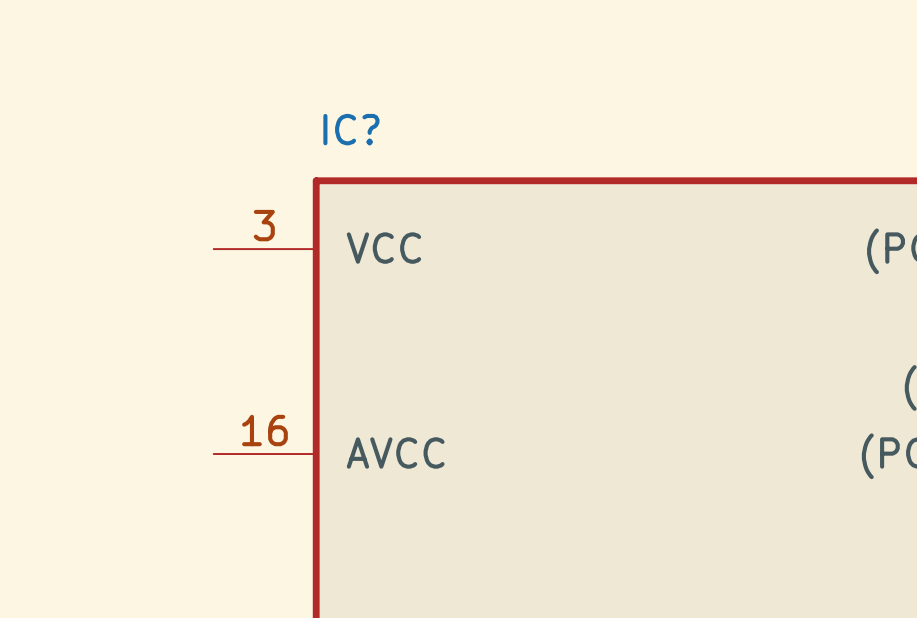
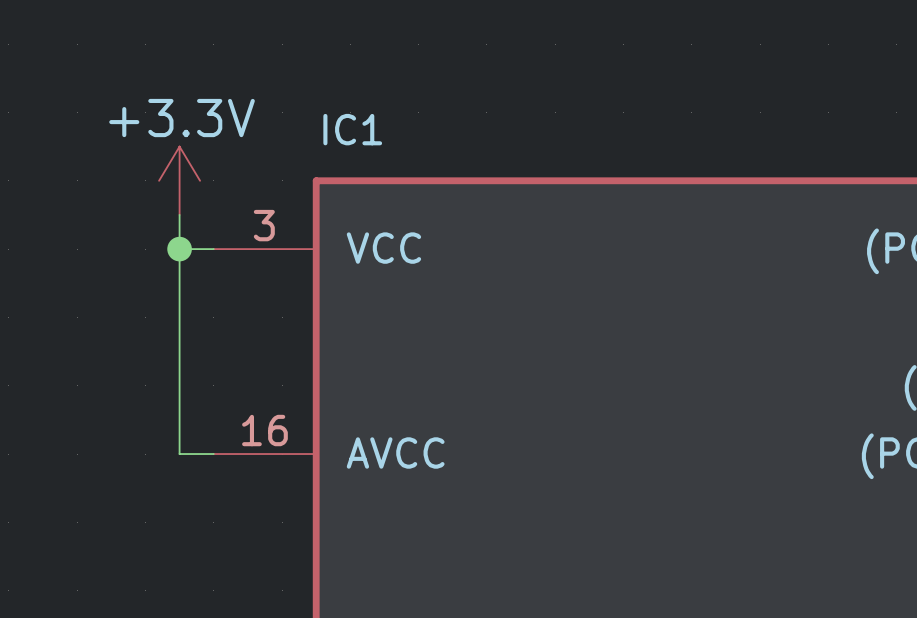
IC? name: IC? (351, 129) -> IC1 (352, 129)
power symbol: none -> +3.3V (179, 180)
wire: none -> (179, 214) (179, 454) (213, 454)
wire: none -> (179, 249) (213, 249)
junction: none -> (179, 249)

